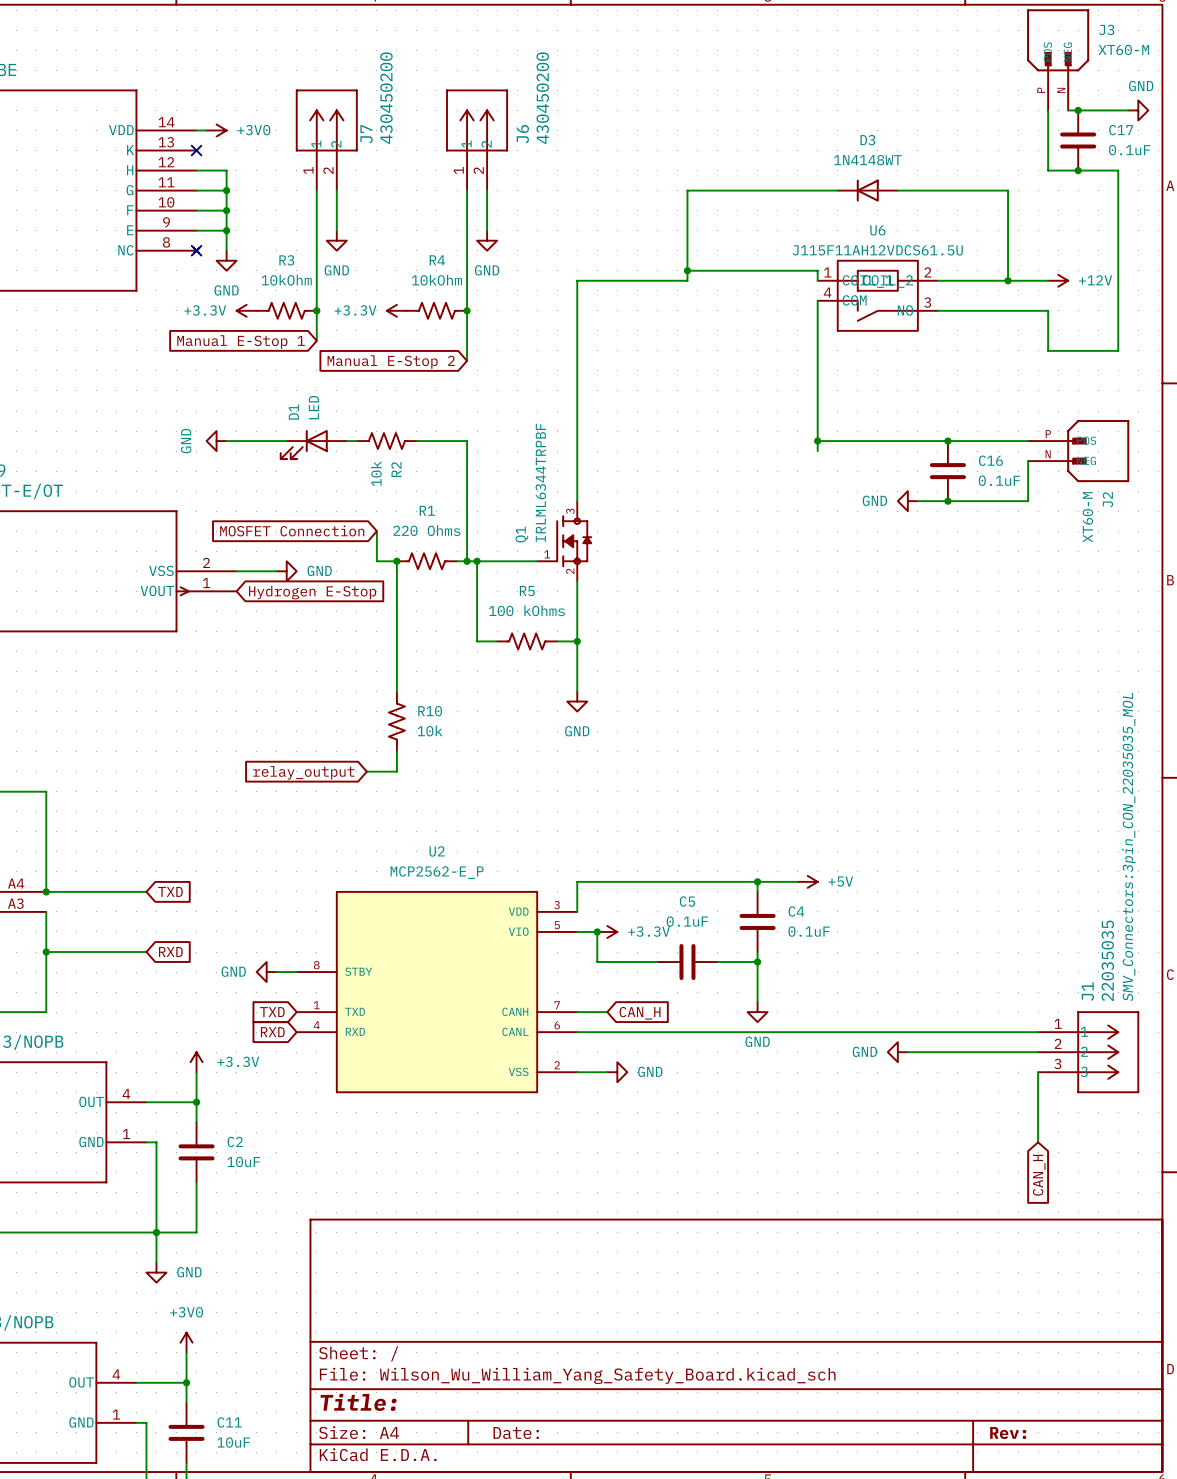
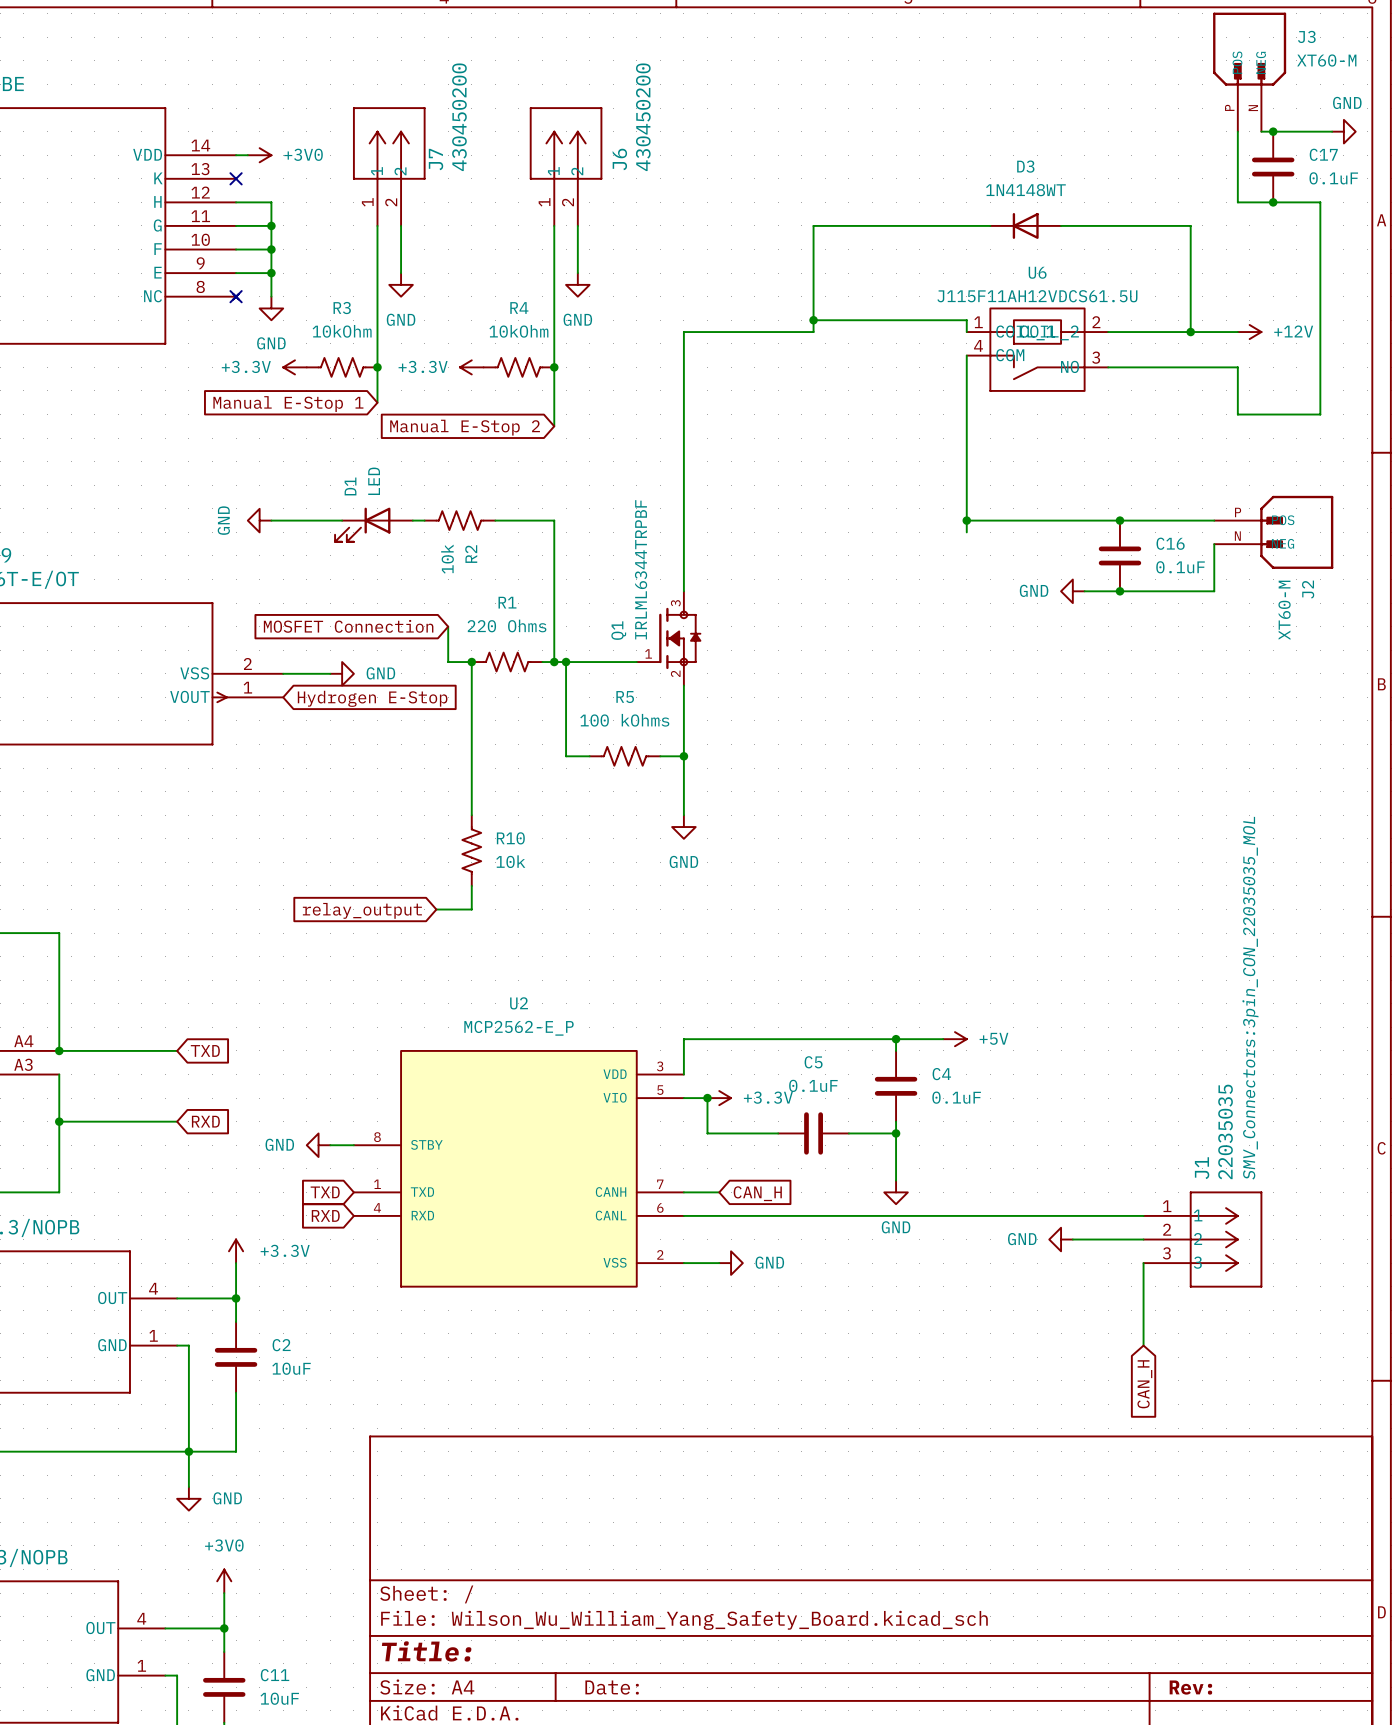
J1 position: (1088, 1052) -> (1202, 1239)
wire: (1038, 1072) (1038, 1142) -> (1143, 1263) (1143, 1345)
global label position: CAN_H (1039, 1175) -> CAN_H (1144, 1384)

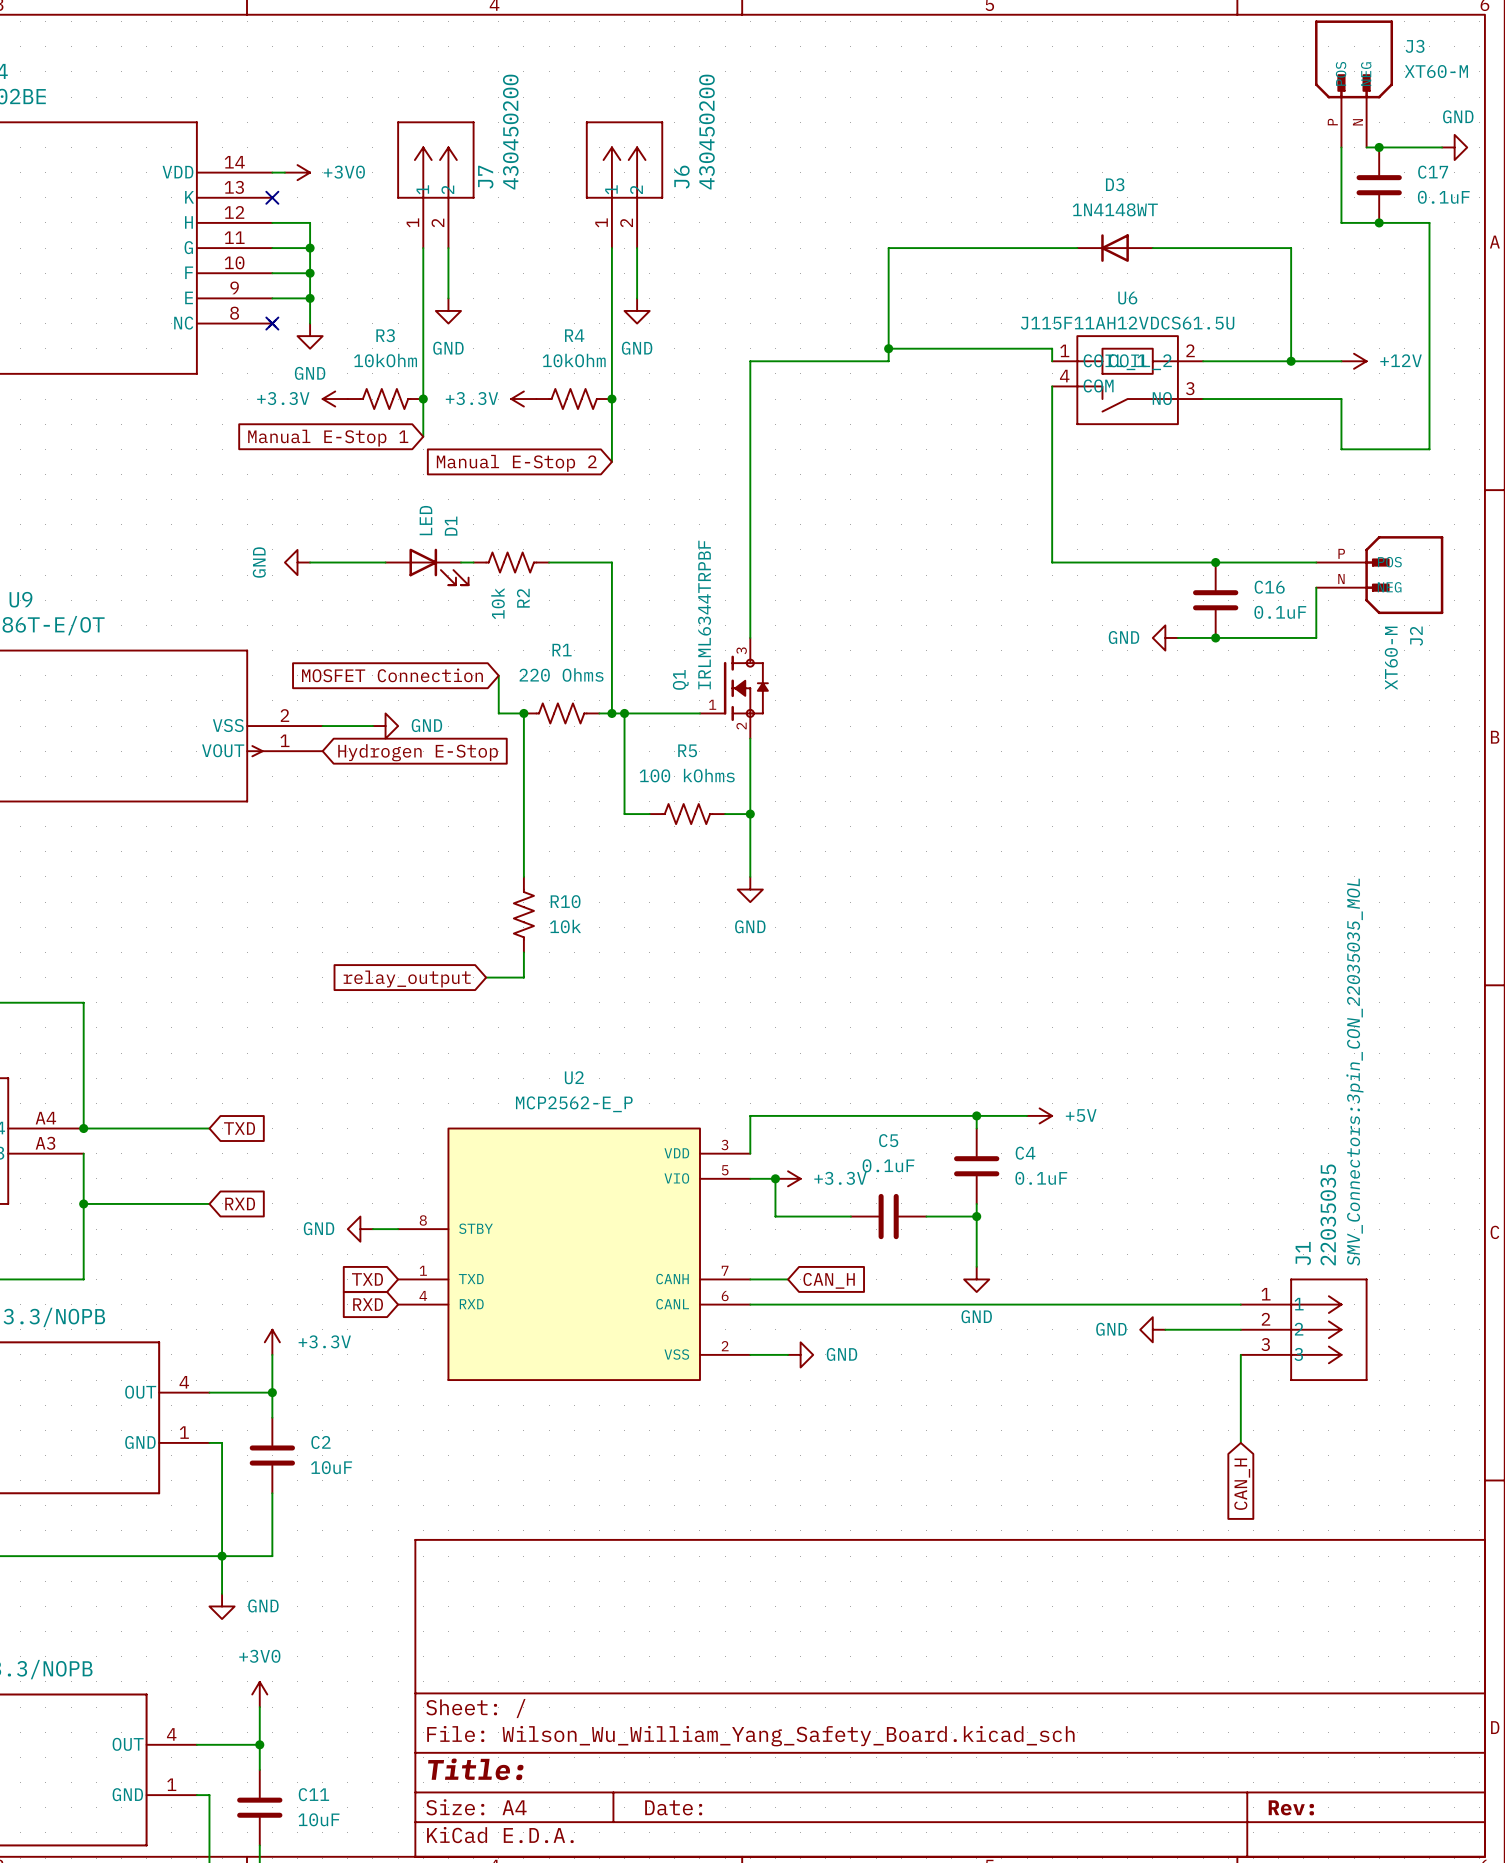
wire: (966, 520) (966, 532) -> none
junction: (966, 520) -> none
D1 flip: as is (362, 524) -> left-right (439, 566)

